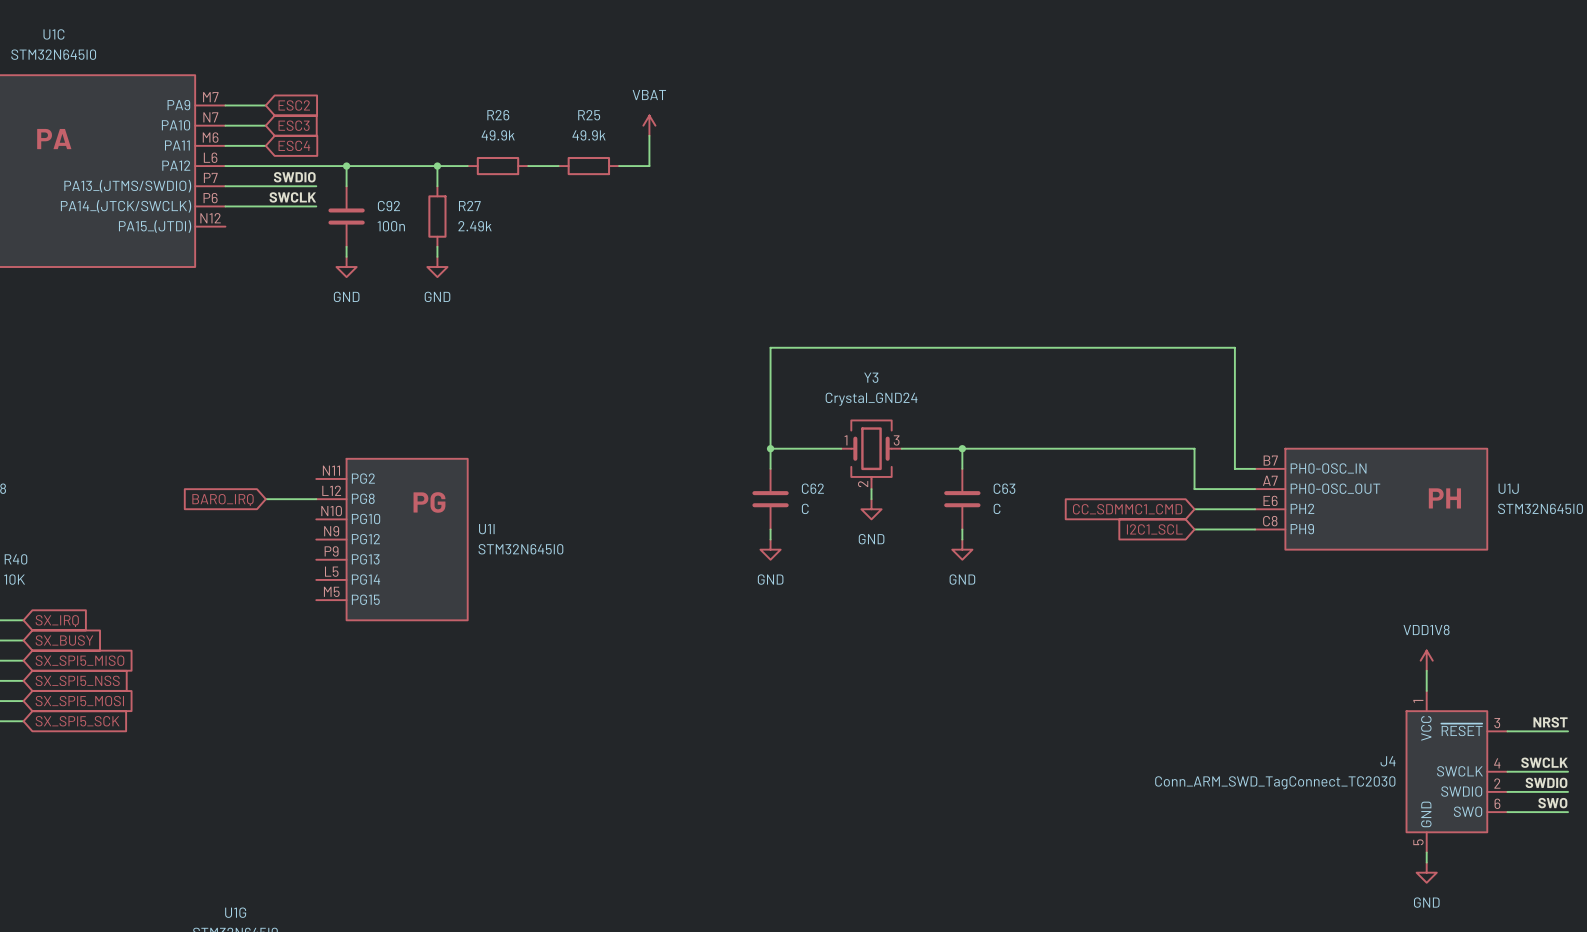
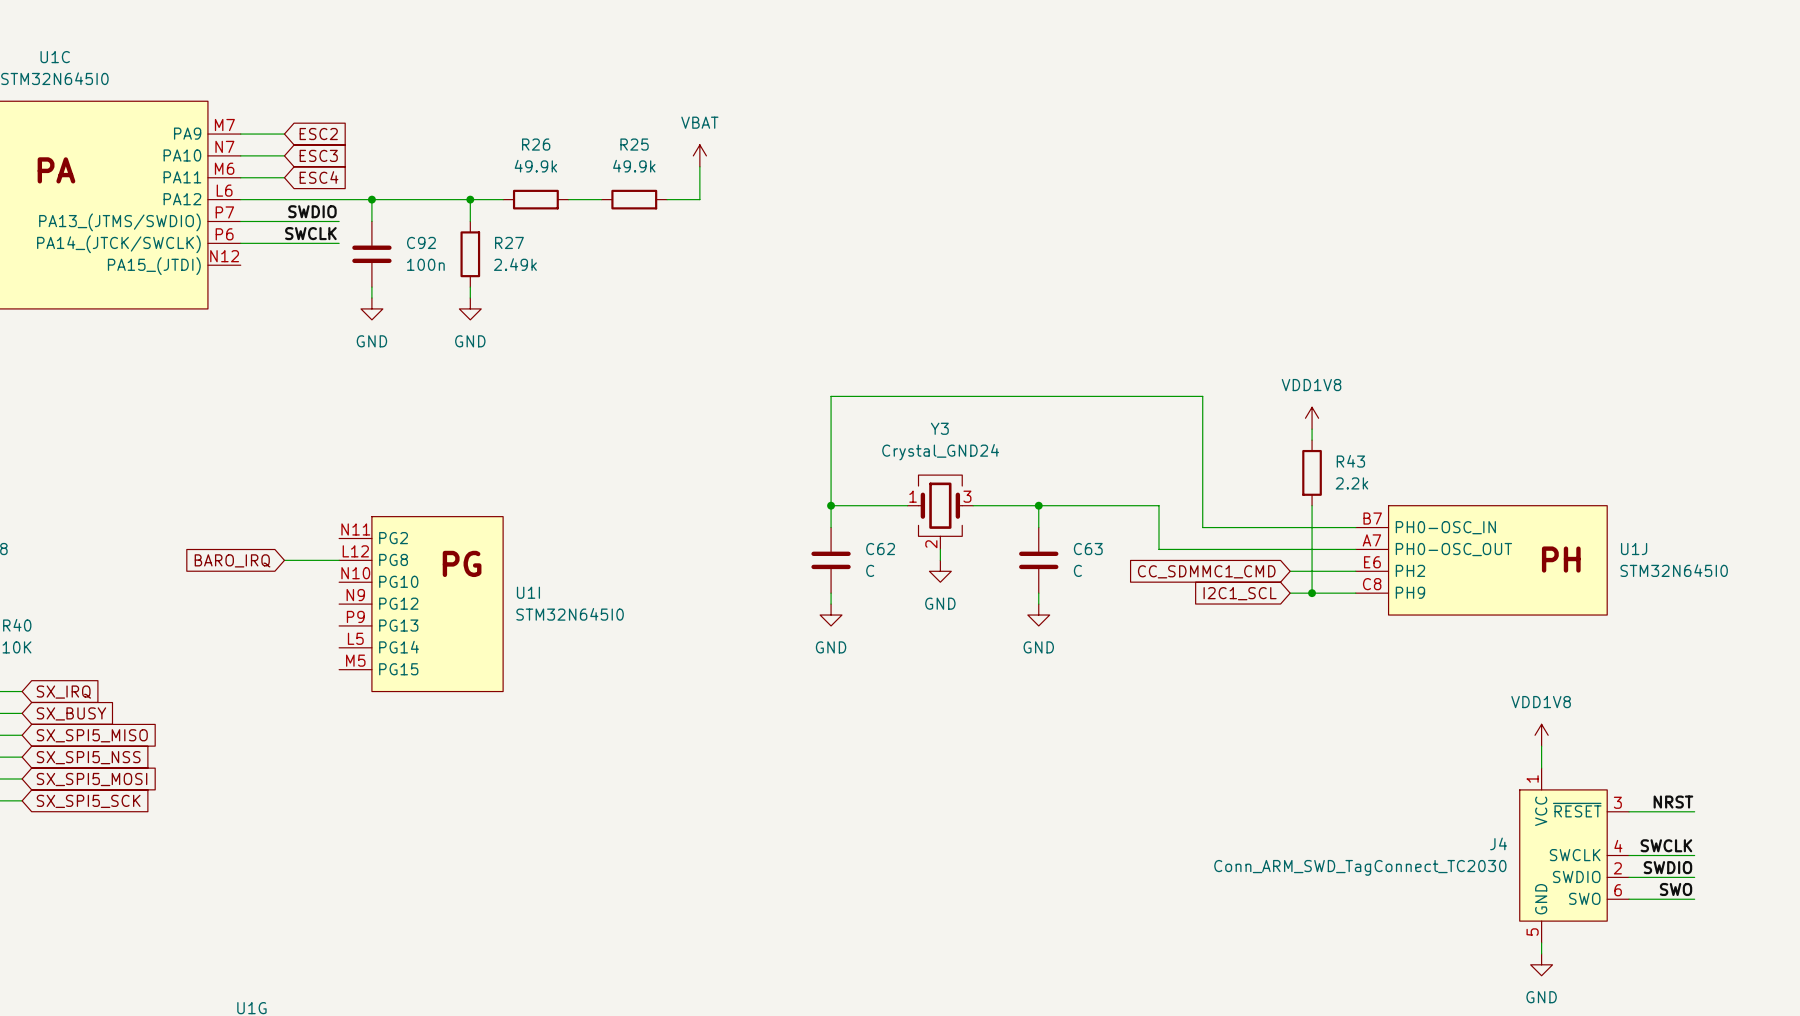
wire: (1113, 347) (1234, 347) (1234, 468) -> (1202, 396) (1202, 527) (1333, 527)
power symbol: none -> VDD1V8 (1312, 418)
wire: none -> (1312, 429) (1312, 440)
R43: none -> 2.2k (1312, 472)
wire: (1073, 448) (1194, 448) (1194, 489) -> (1159, 505) (1159, 549) (1290, 549)
wire: none -> (1312, 505) (1312, 593)
junction: none -> (1312, 593)

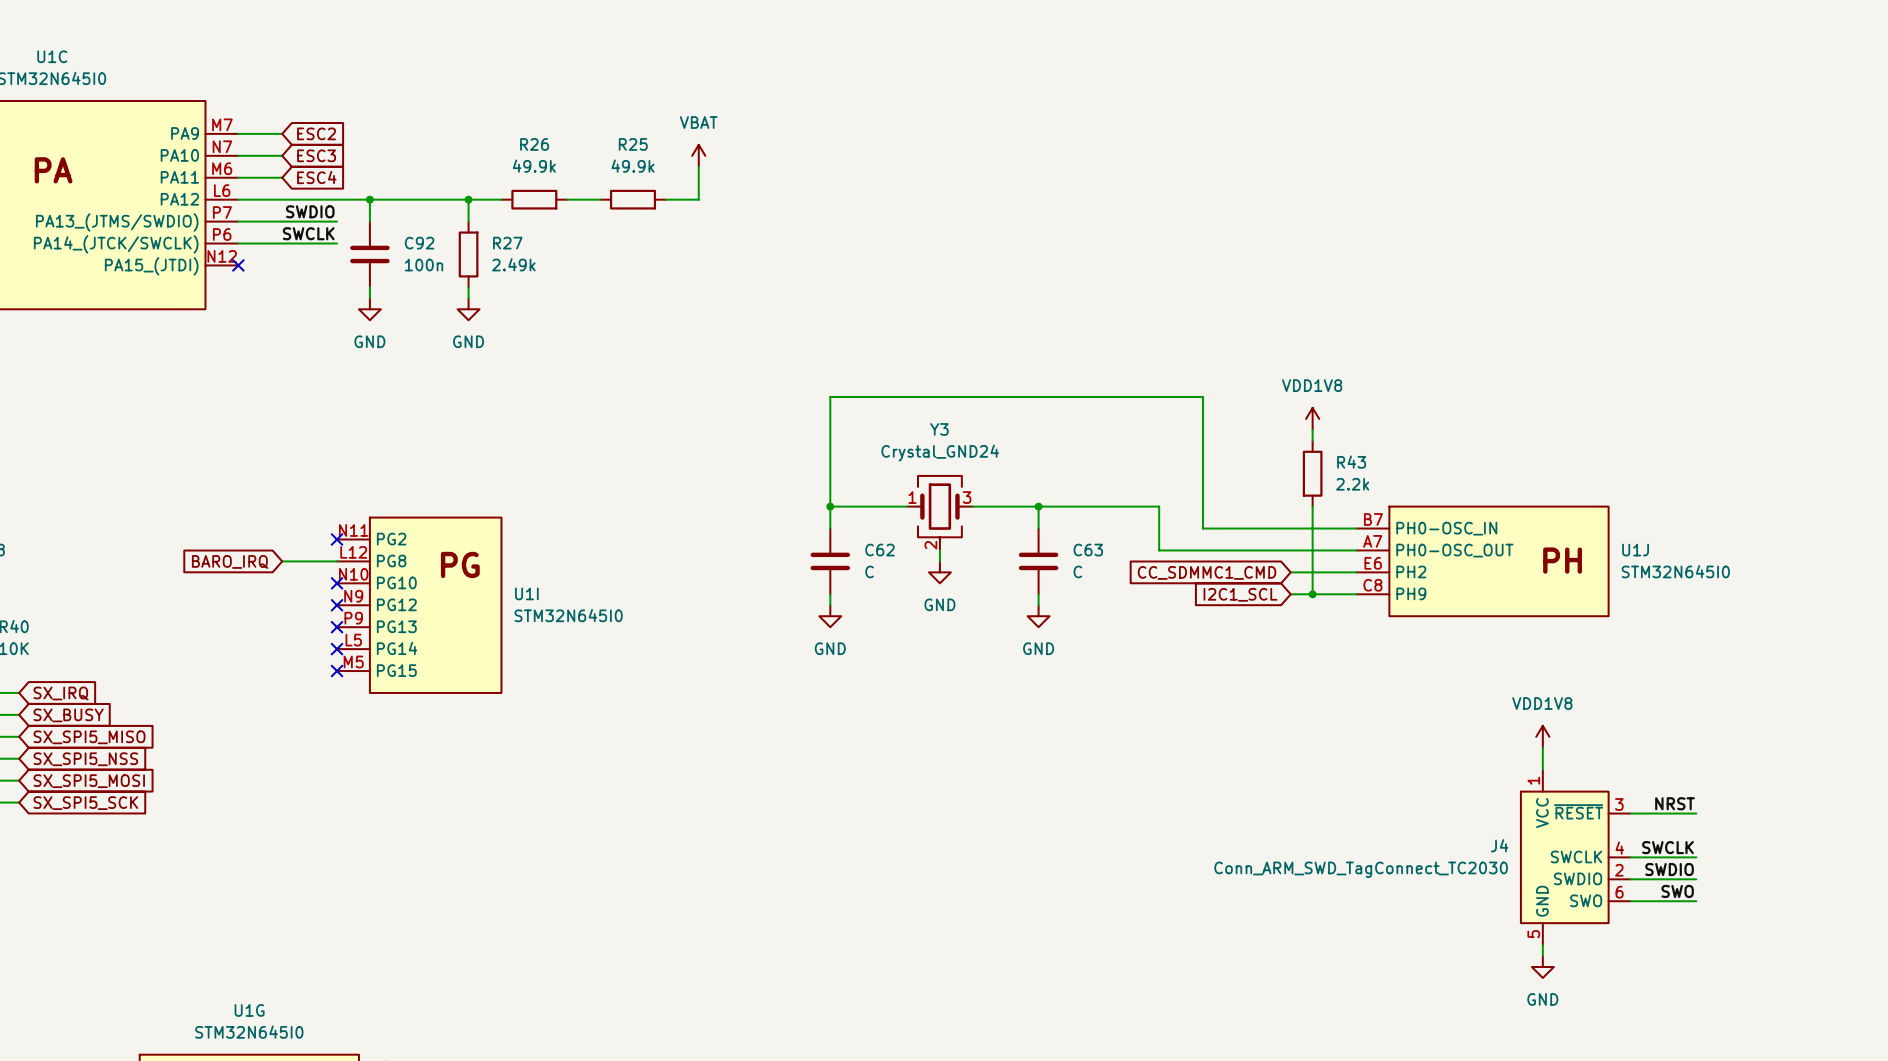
no-connect mark: none -> (238, 265)
no-connect mark: none -> (337, 539)
no-connect mark: none -> (337, 583)
no-connect mark: none -> (337, 605)
no-connect mark: none -> (337, 627)
no-connect mark: none -> (337, 649)
no-connect mark: none -> (337, 671)

